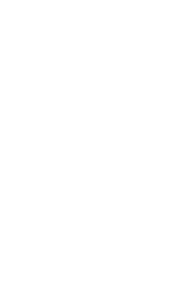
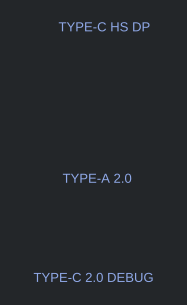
text: none -> TYPE-C HS DP (104, 26)
text: none -> TYPE-A 2.0 (97, 178)
text: none -> TYPE-C 2.0 DEBUG (93, 277)

